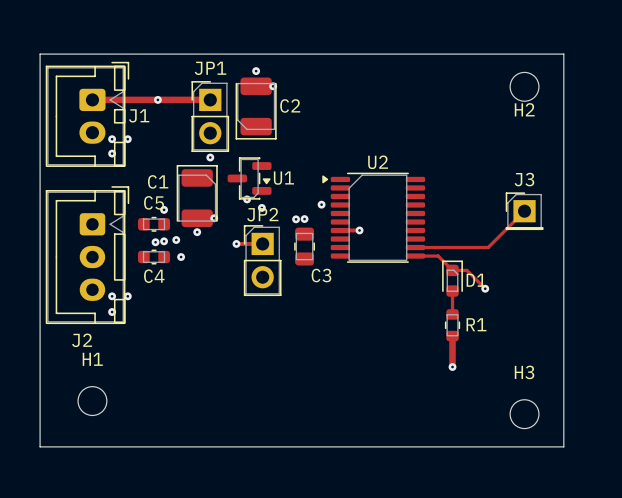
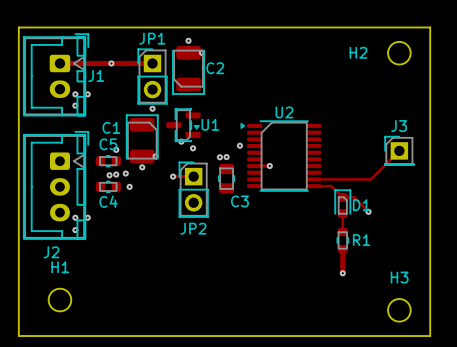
H2 name position: H2 (524, 109) -> H2 (358, 52)
JP2 name position: JP2 (262, 214) -> JP2 (193, 228)

